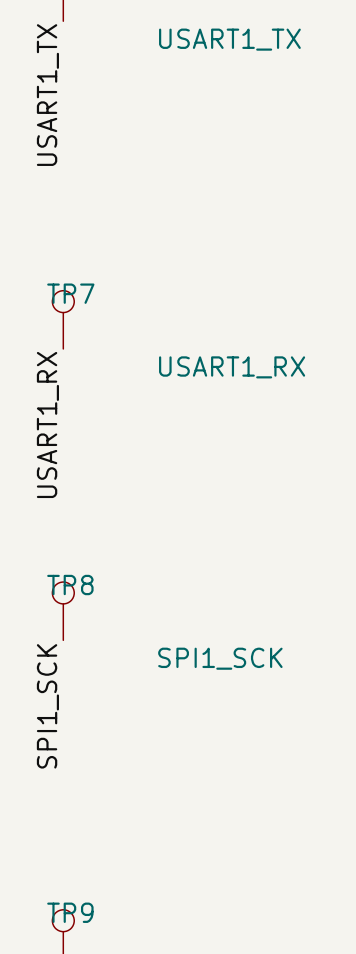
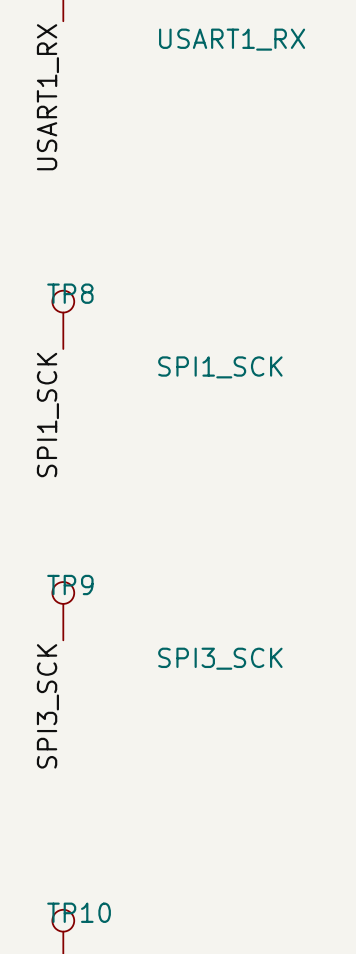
part value: USART1_TX (229, 39) -> USART1_RX (232, 39)
label: USART1_TX (47, 95) -> USART1_RX (47, 97)
TP7 name: TP7 (70, 293) -> TP8 (70, 293)
TP7 value: USART1_RX (232, 367) -> SPI1_SCK (220, 367)
label: USART1_RX (47, 424) -> SPI1_SCK (47, 415)
TP8 name: TP8 (70, 585) -> TP9 (70, 585)
TP8 value: SPI1_SCK (220, 658) -> SPI3_SCK (220, 658)
label: SPI1_SCK (47, 706) -> SPI3_SCK (47, 706)
TP9 name: TP9 (70, 912) -> TP10 (79, 912)

